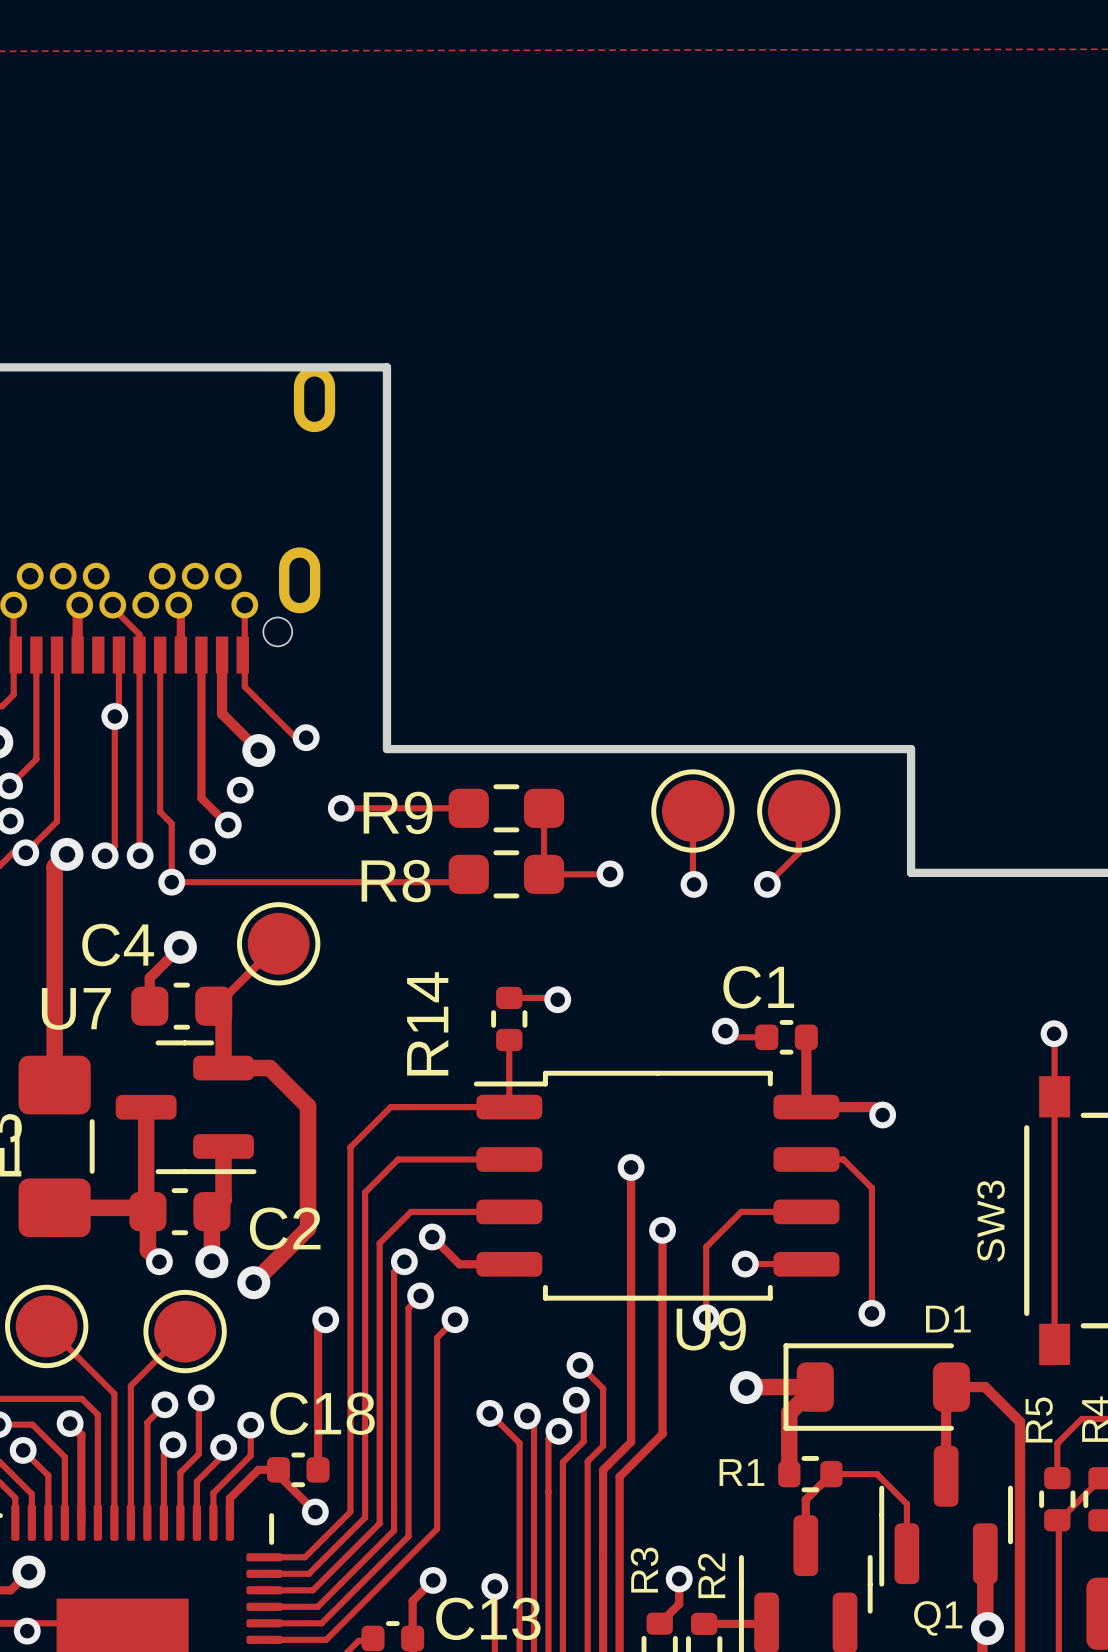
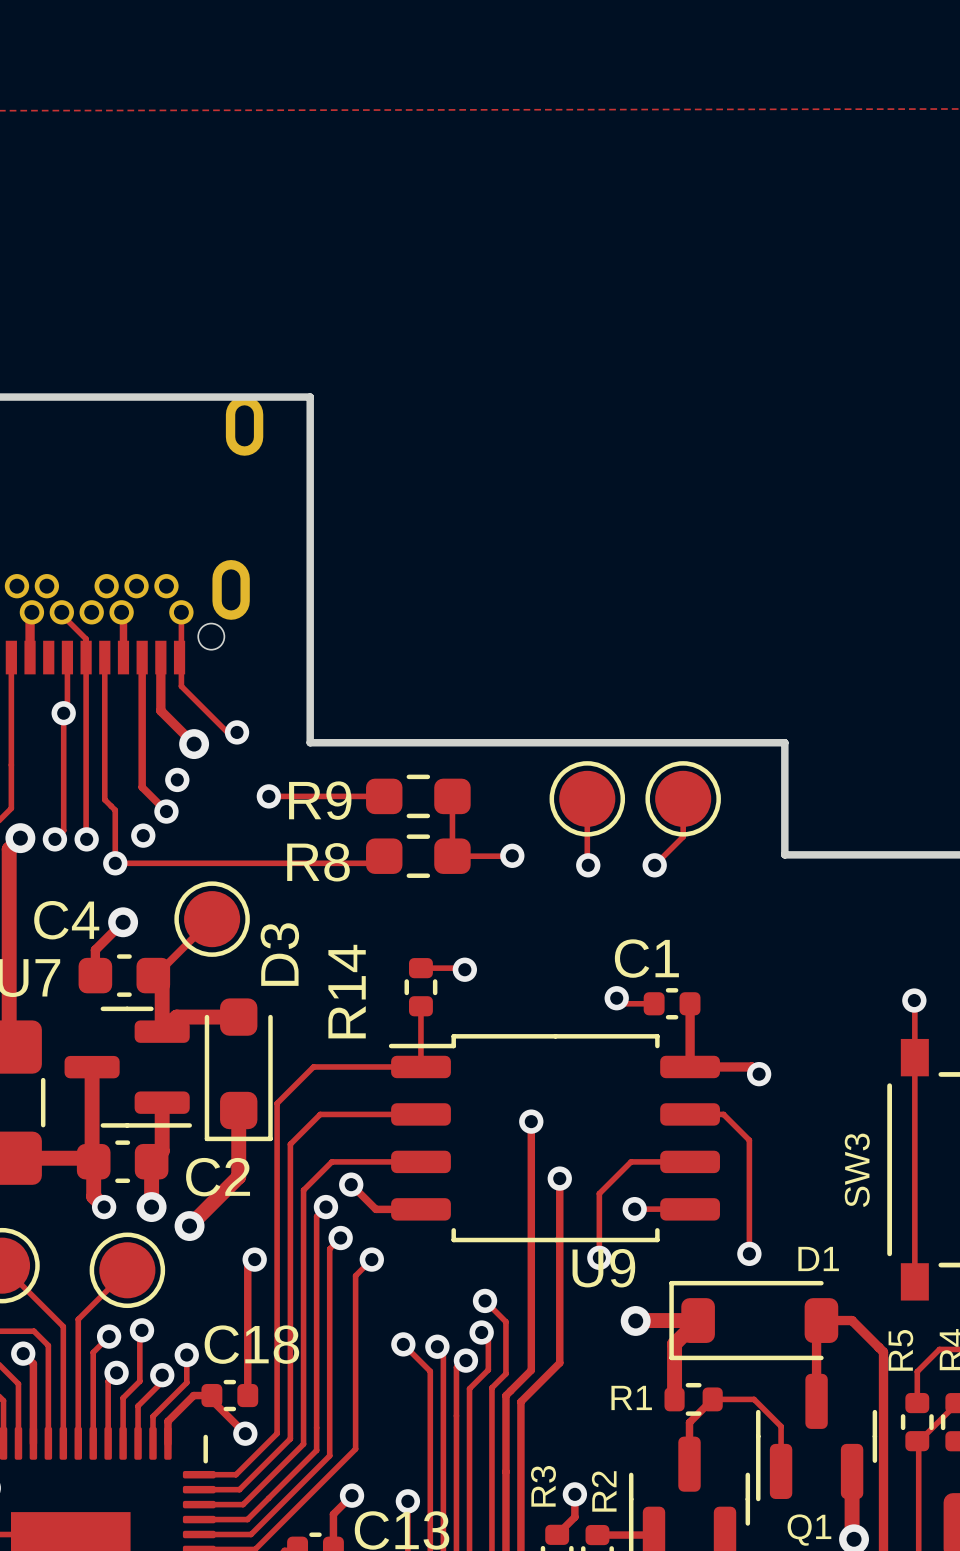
track: (223, 1068) (269, 1068) (308, 1106) (308, 1155) -> (162, 1031) (176, 1017) (238, 1017)
D3: none -> (238, 1069)

